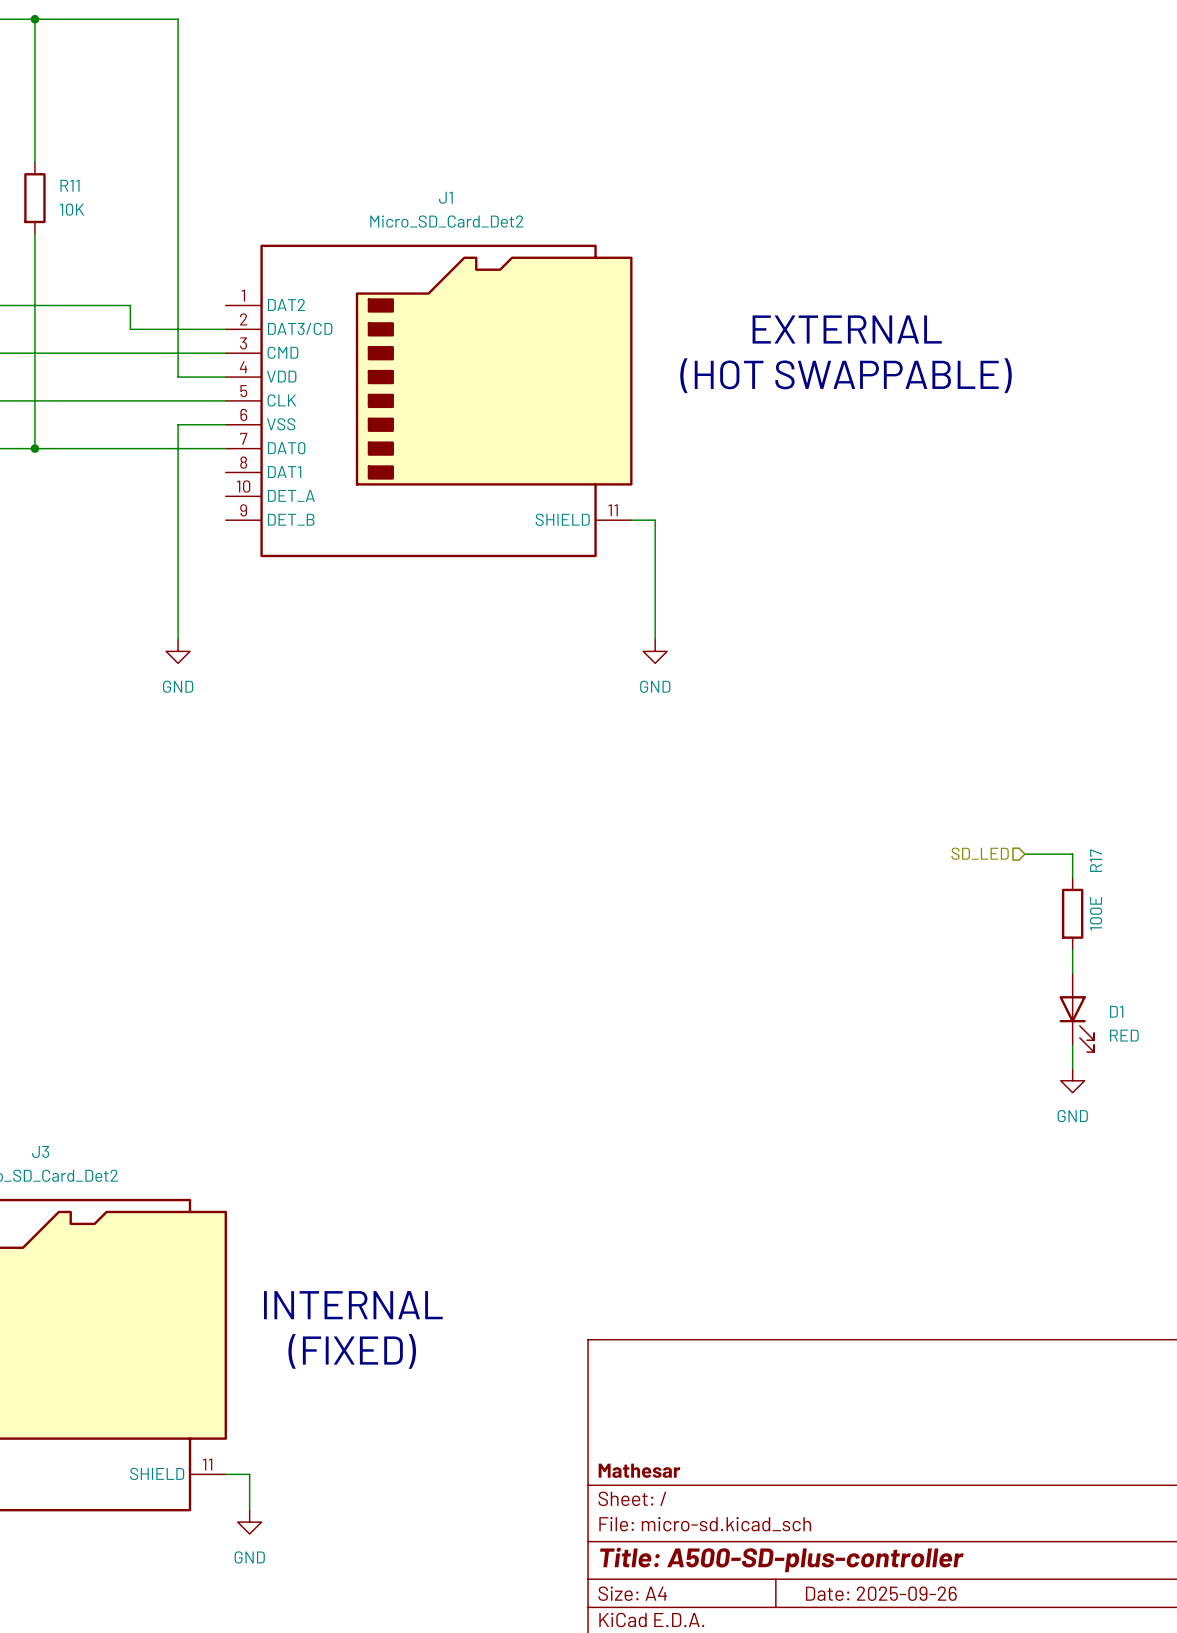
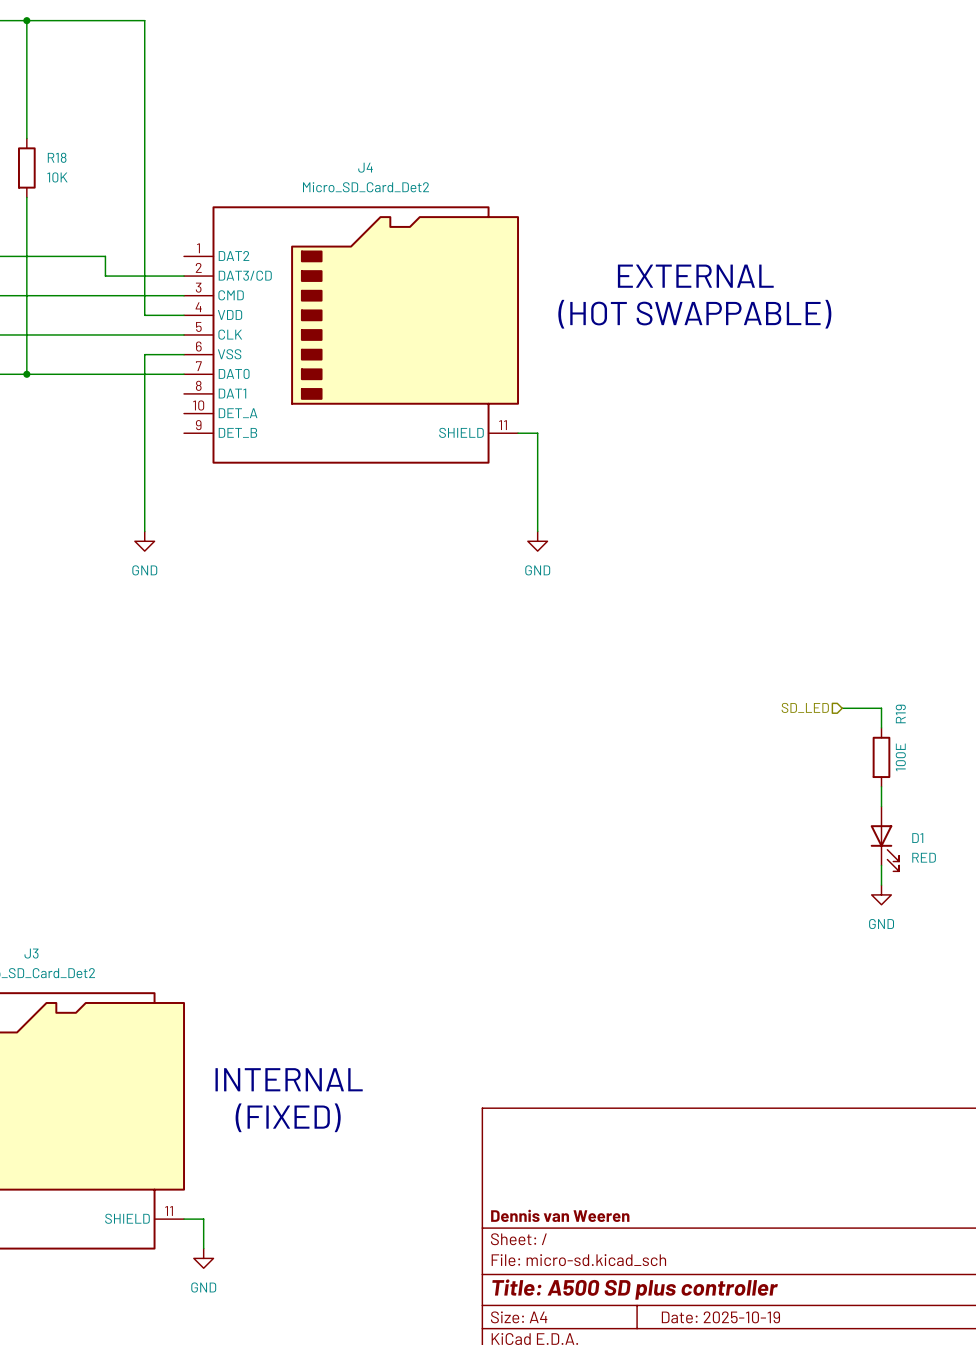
R11 name: R11 (69, 185) -> R18 (57, 157)
J1 name: J1 (445, 197) -> J4 (365, 167)
R17 name: R17 (1096, 860) -> R19 (900, 713)
title block: Mathesar (639, 1470) -> Dennis van Weeren (560, 1215)
title block: Title: A500-SD-plus-controller (781, 1559) -> Title: A500 SD plus controller (635, 1289)
title block: Date: 2025-09-26 (881, 1593) -> Date: 2025-10-19 (720, 1317)

